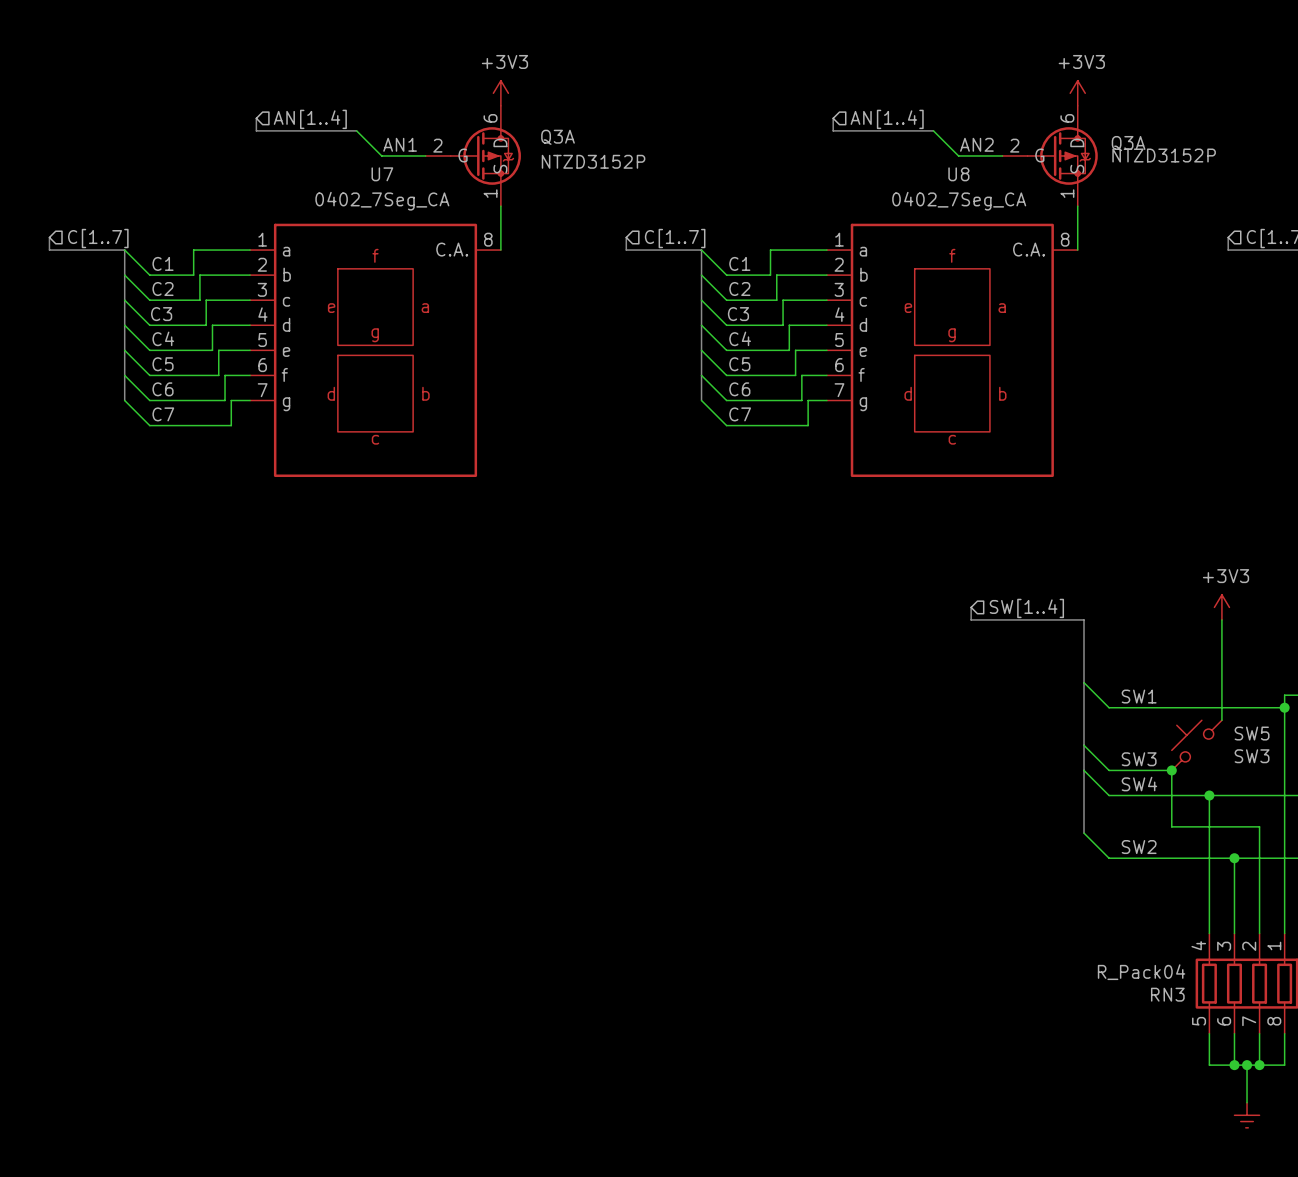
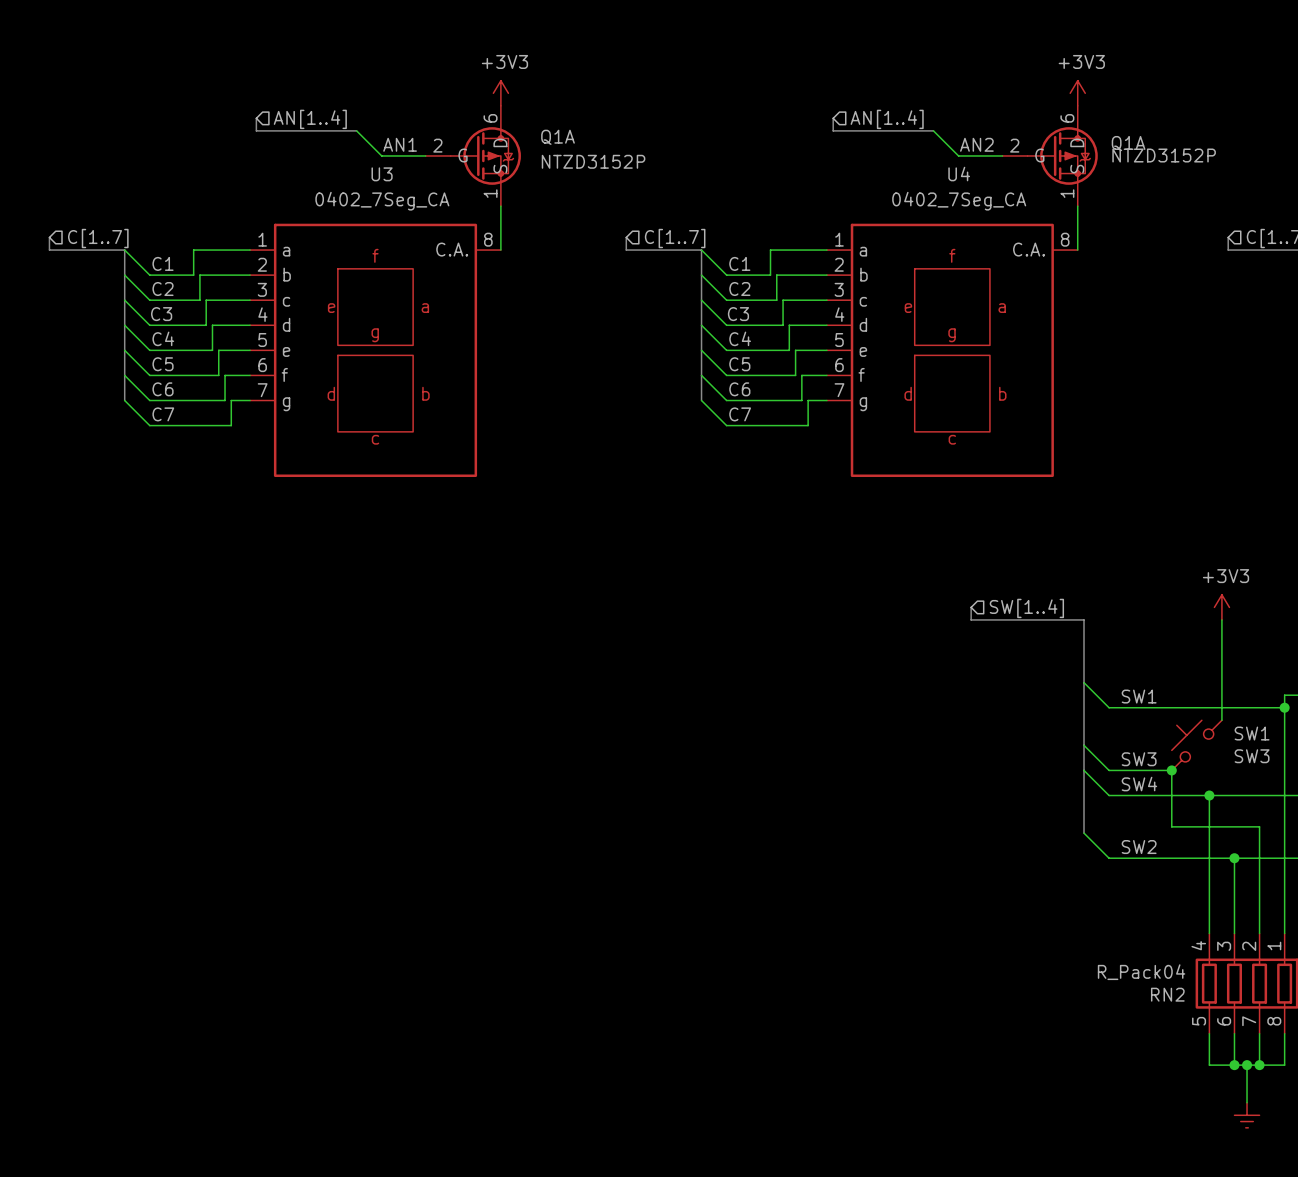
Q3A name: Q3A (558, 137) -> Q1A (558, 137)
Q3A name: Q3A (1128, 143) -> Q1A (1128, 143)
U7 name: U7 (382, 174) -> U3 (382, 174)
U8 name: U8 (958, 174) -> U4 (959, 174)
SW5 name: SW5 (1252, 733) -> SW1 (1252, 733)
RN3 name: RN3 (1167, 994) -> RN2 (1167, 994)

